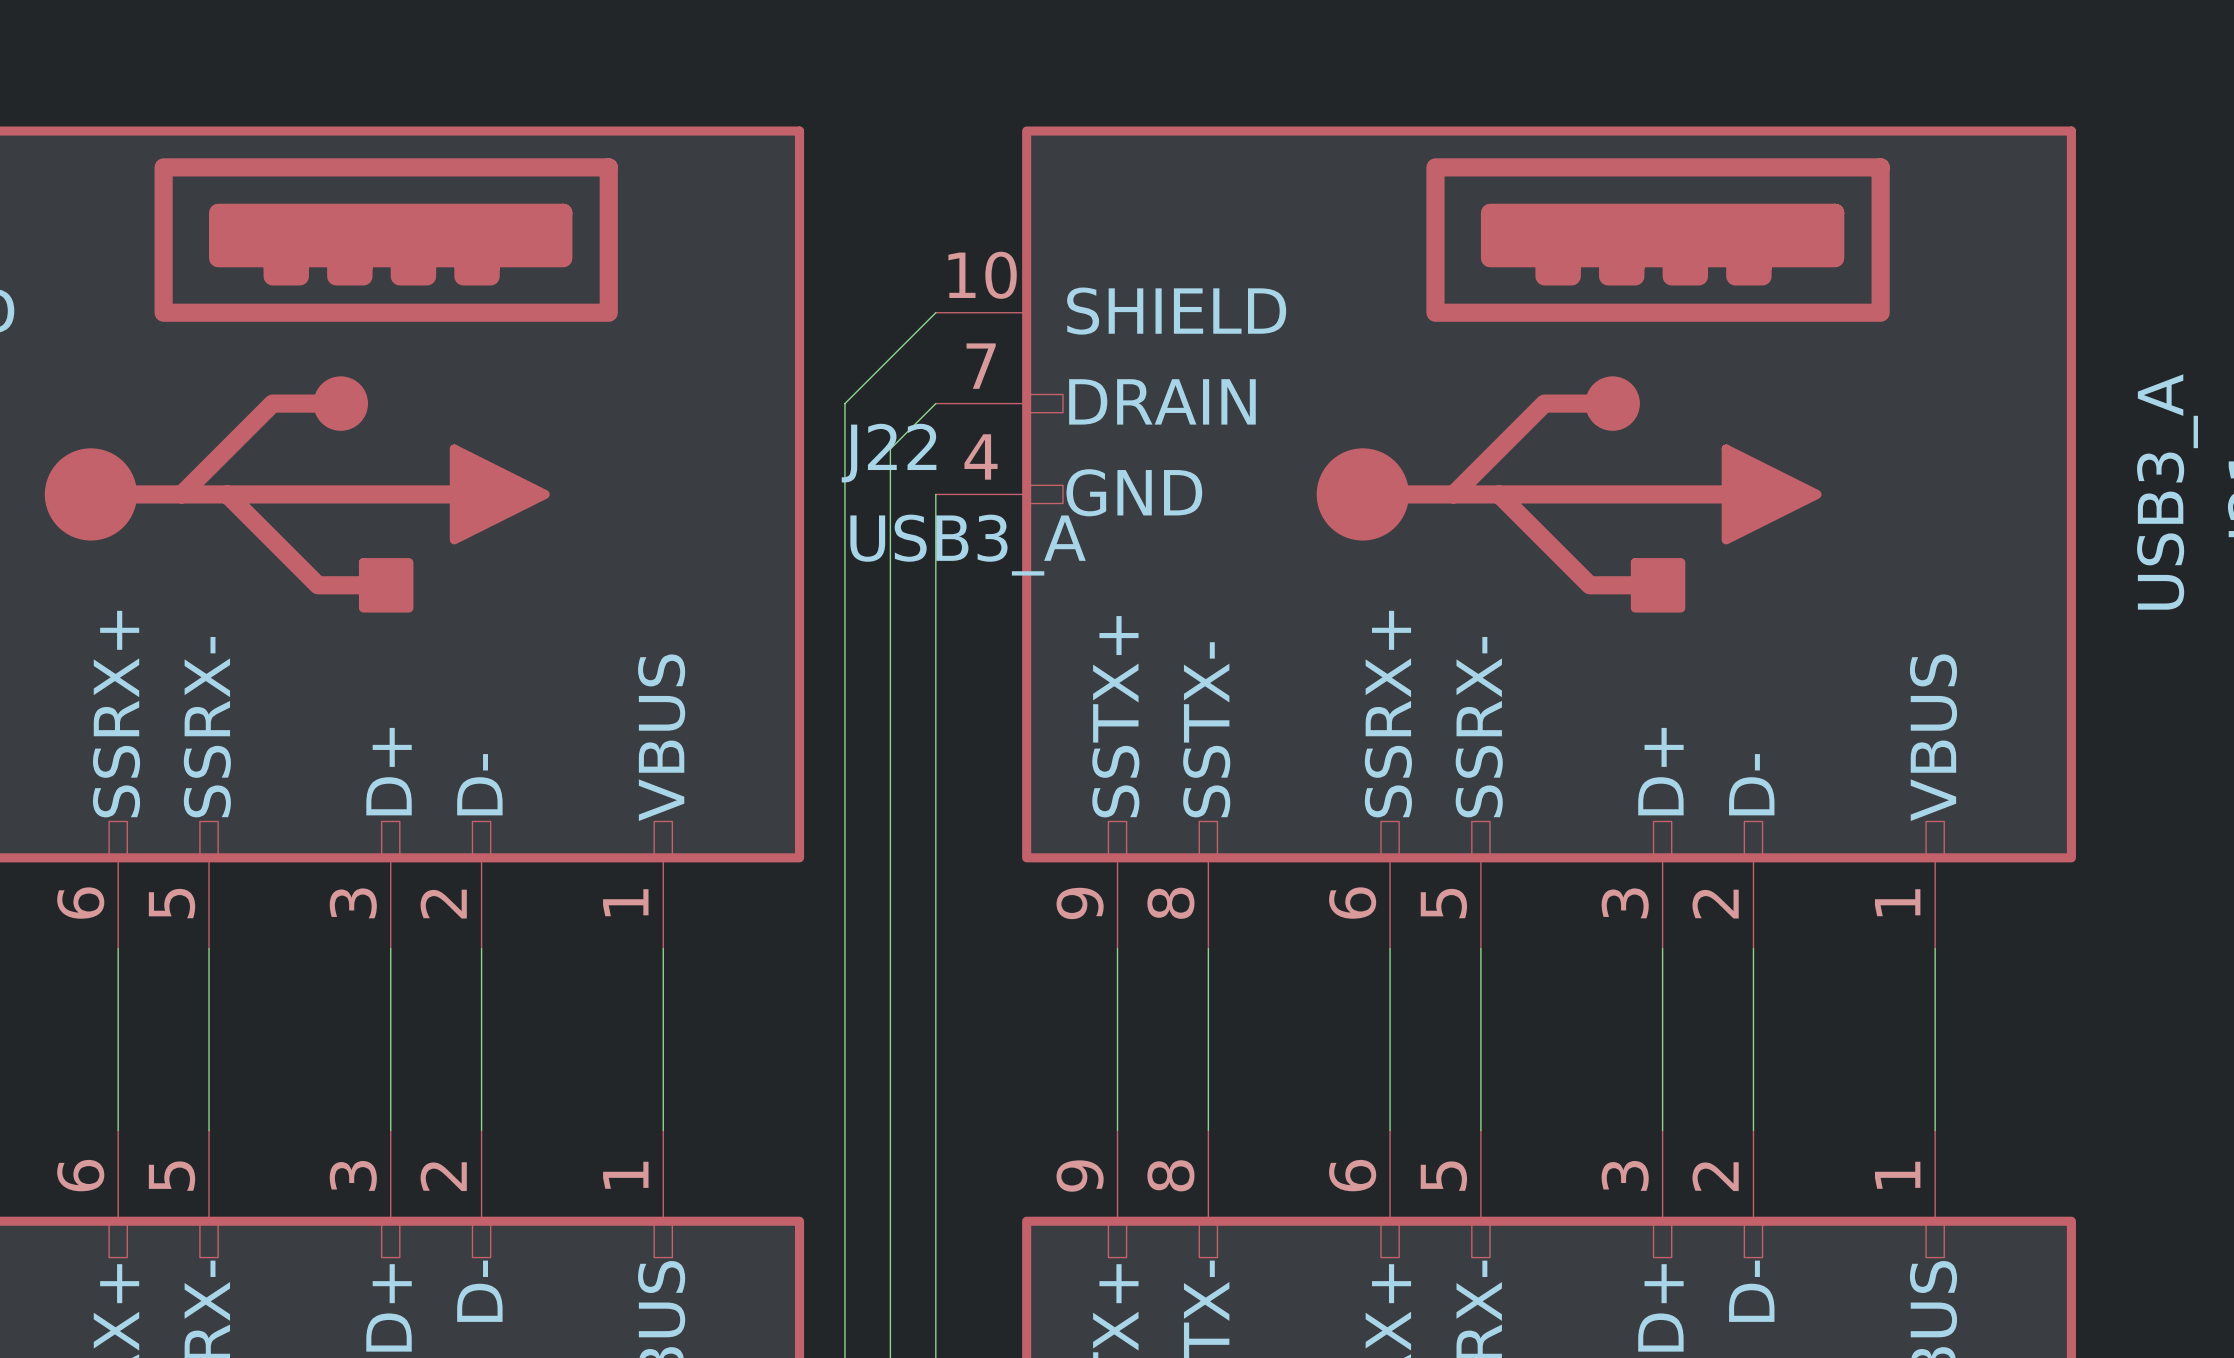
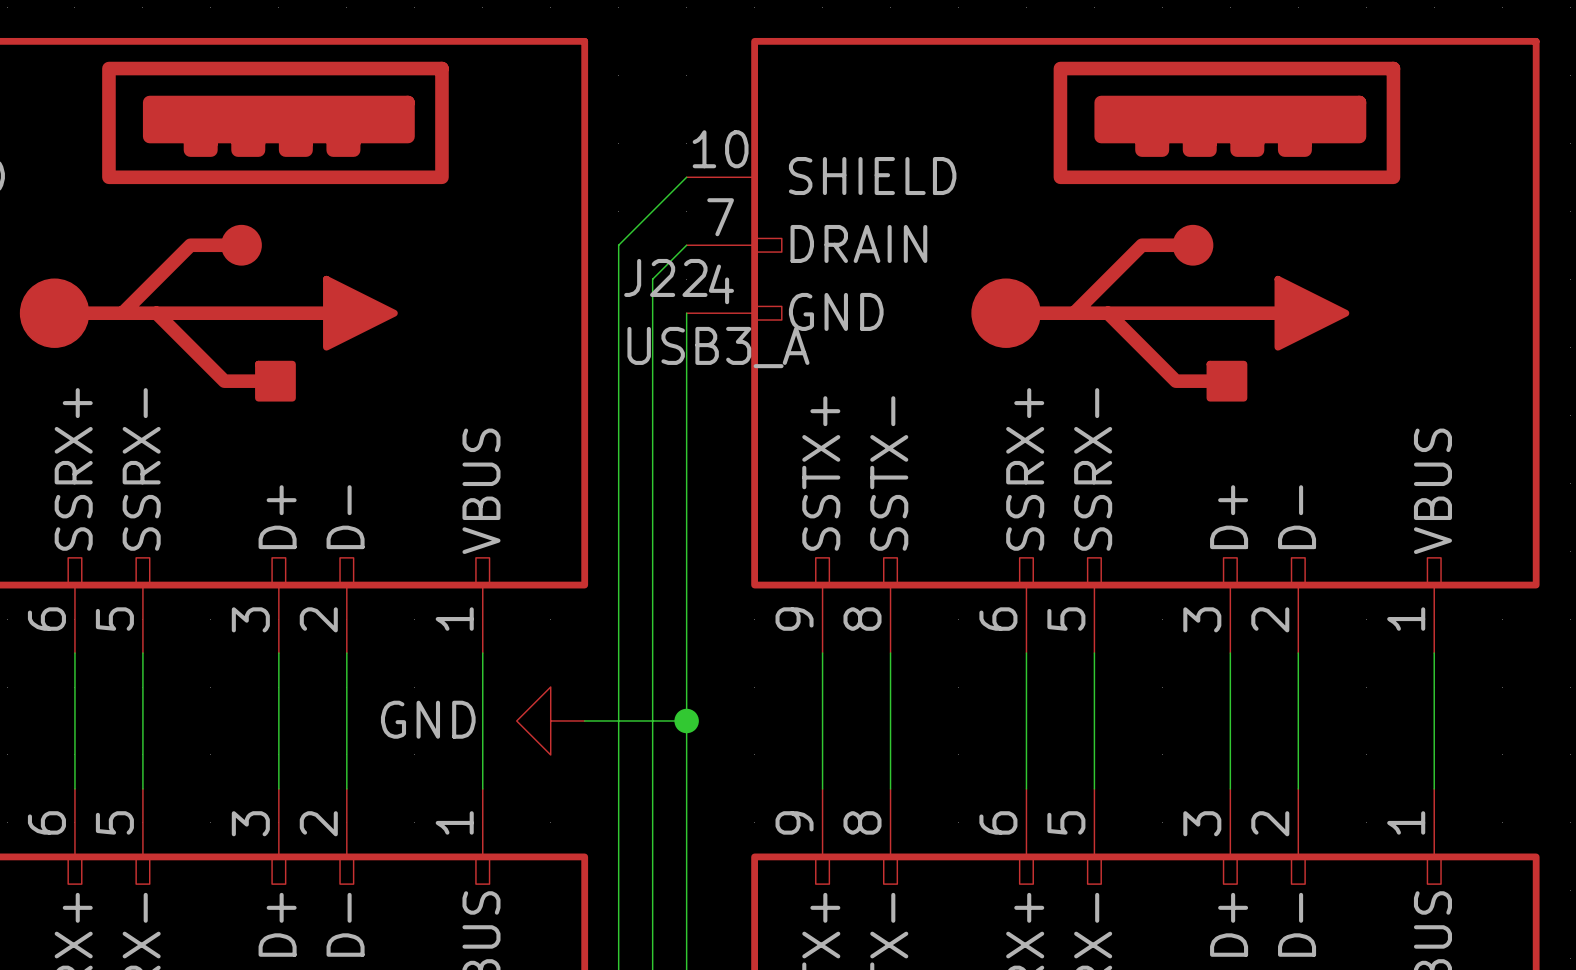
power symbol: none -> GND (550, 720)
wire: none -> (584, 720) (686, 720)
junction: none -> (686, 720)

